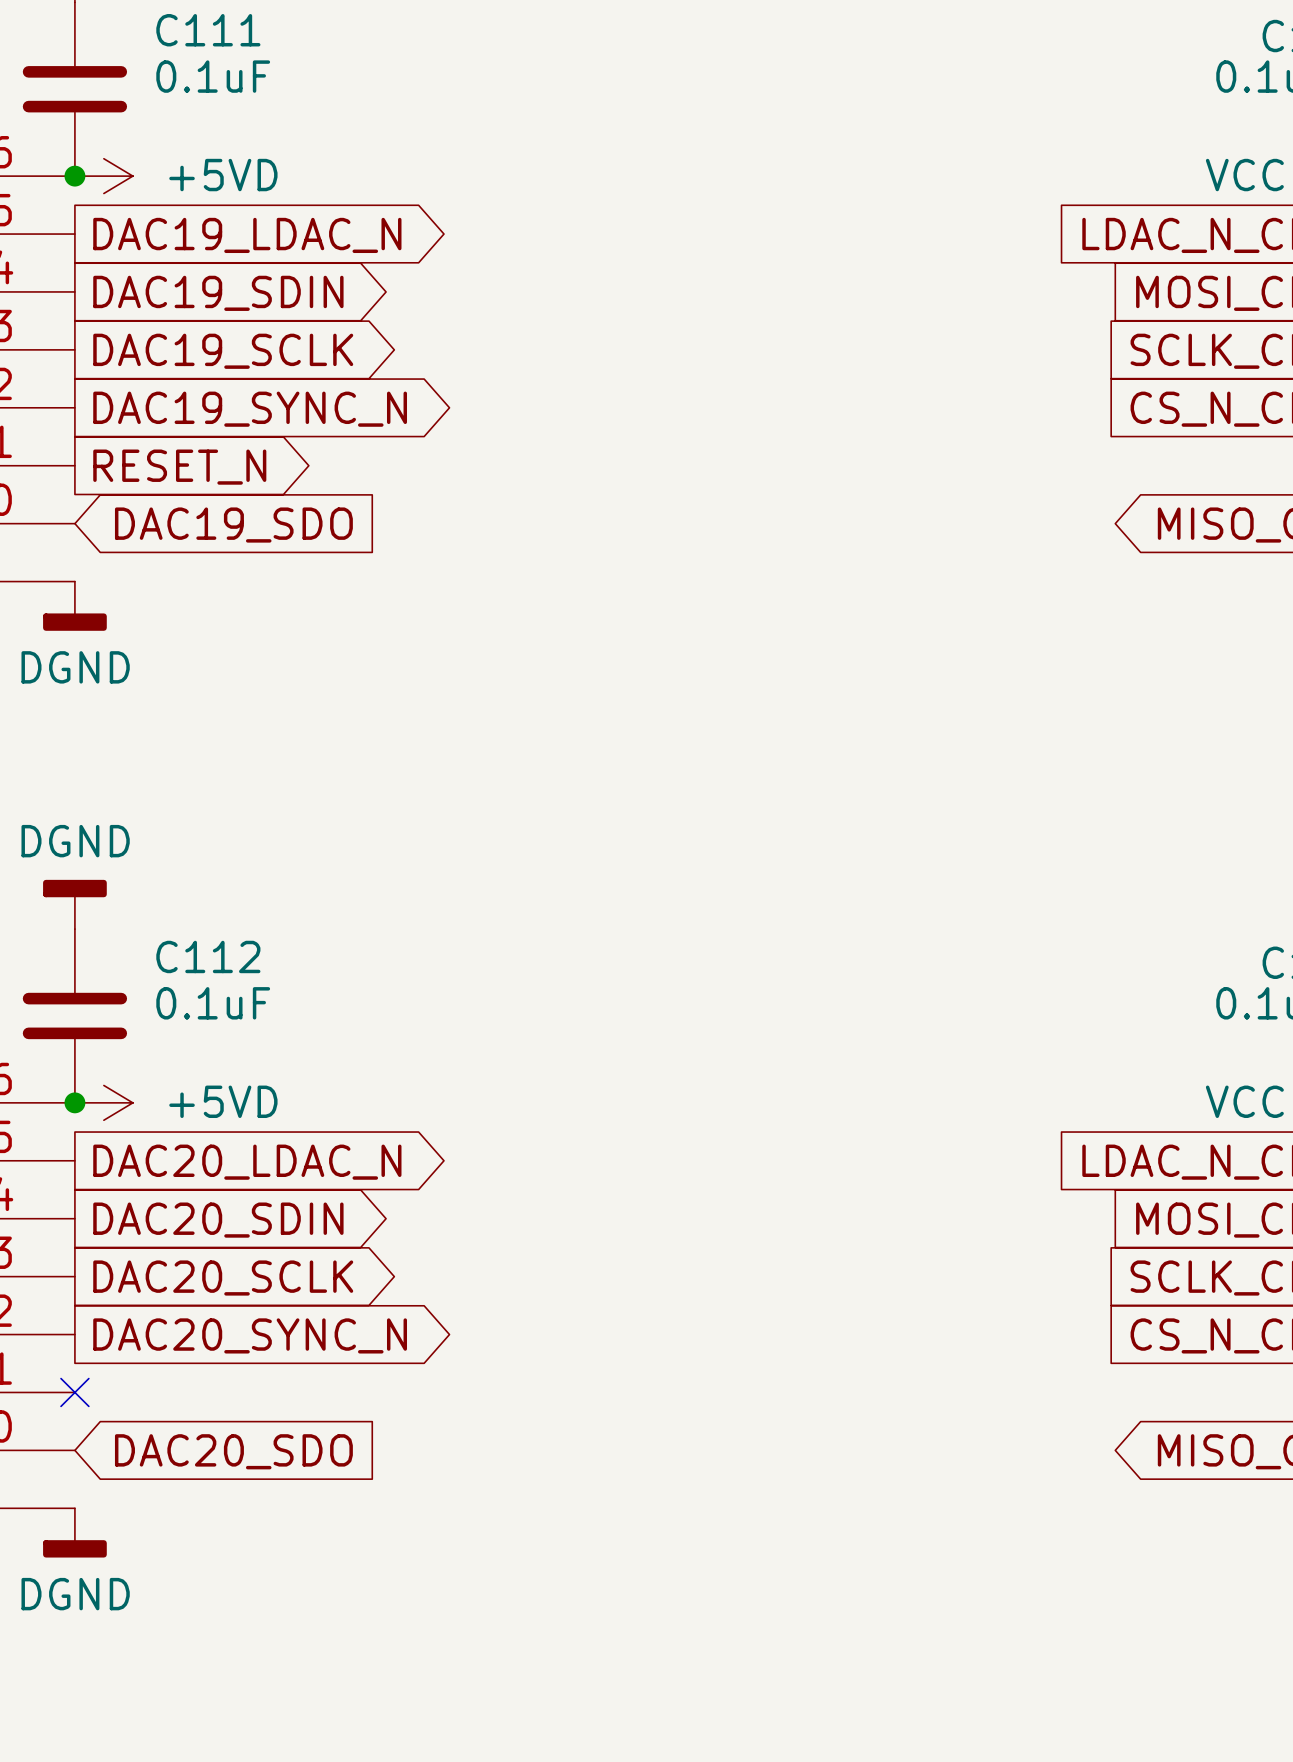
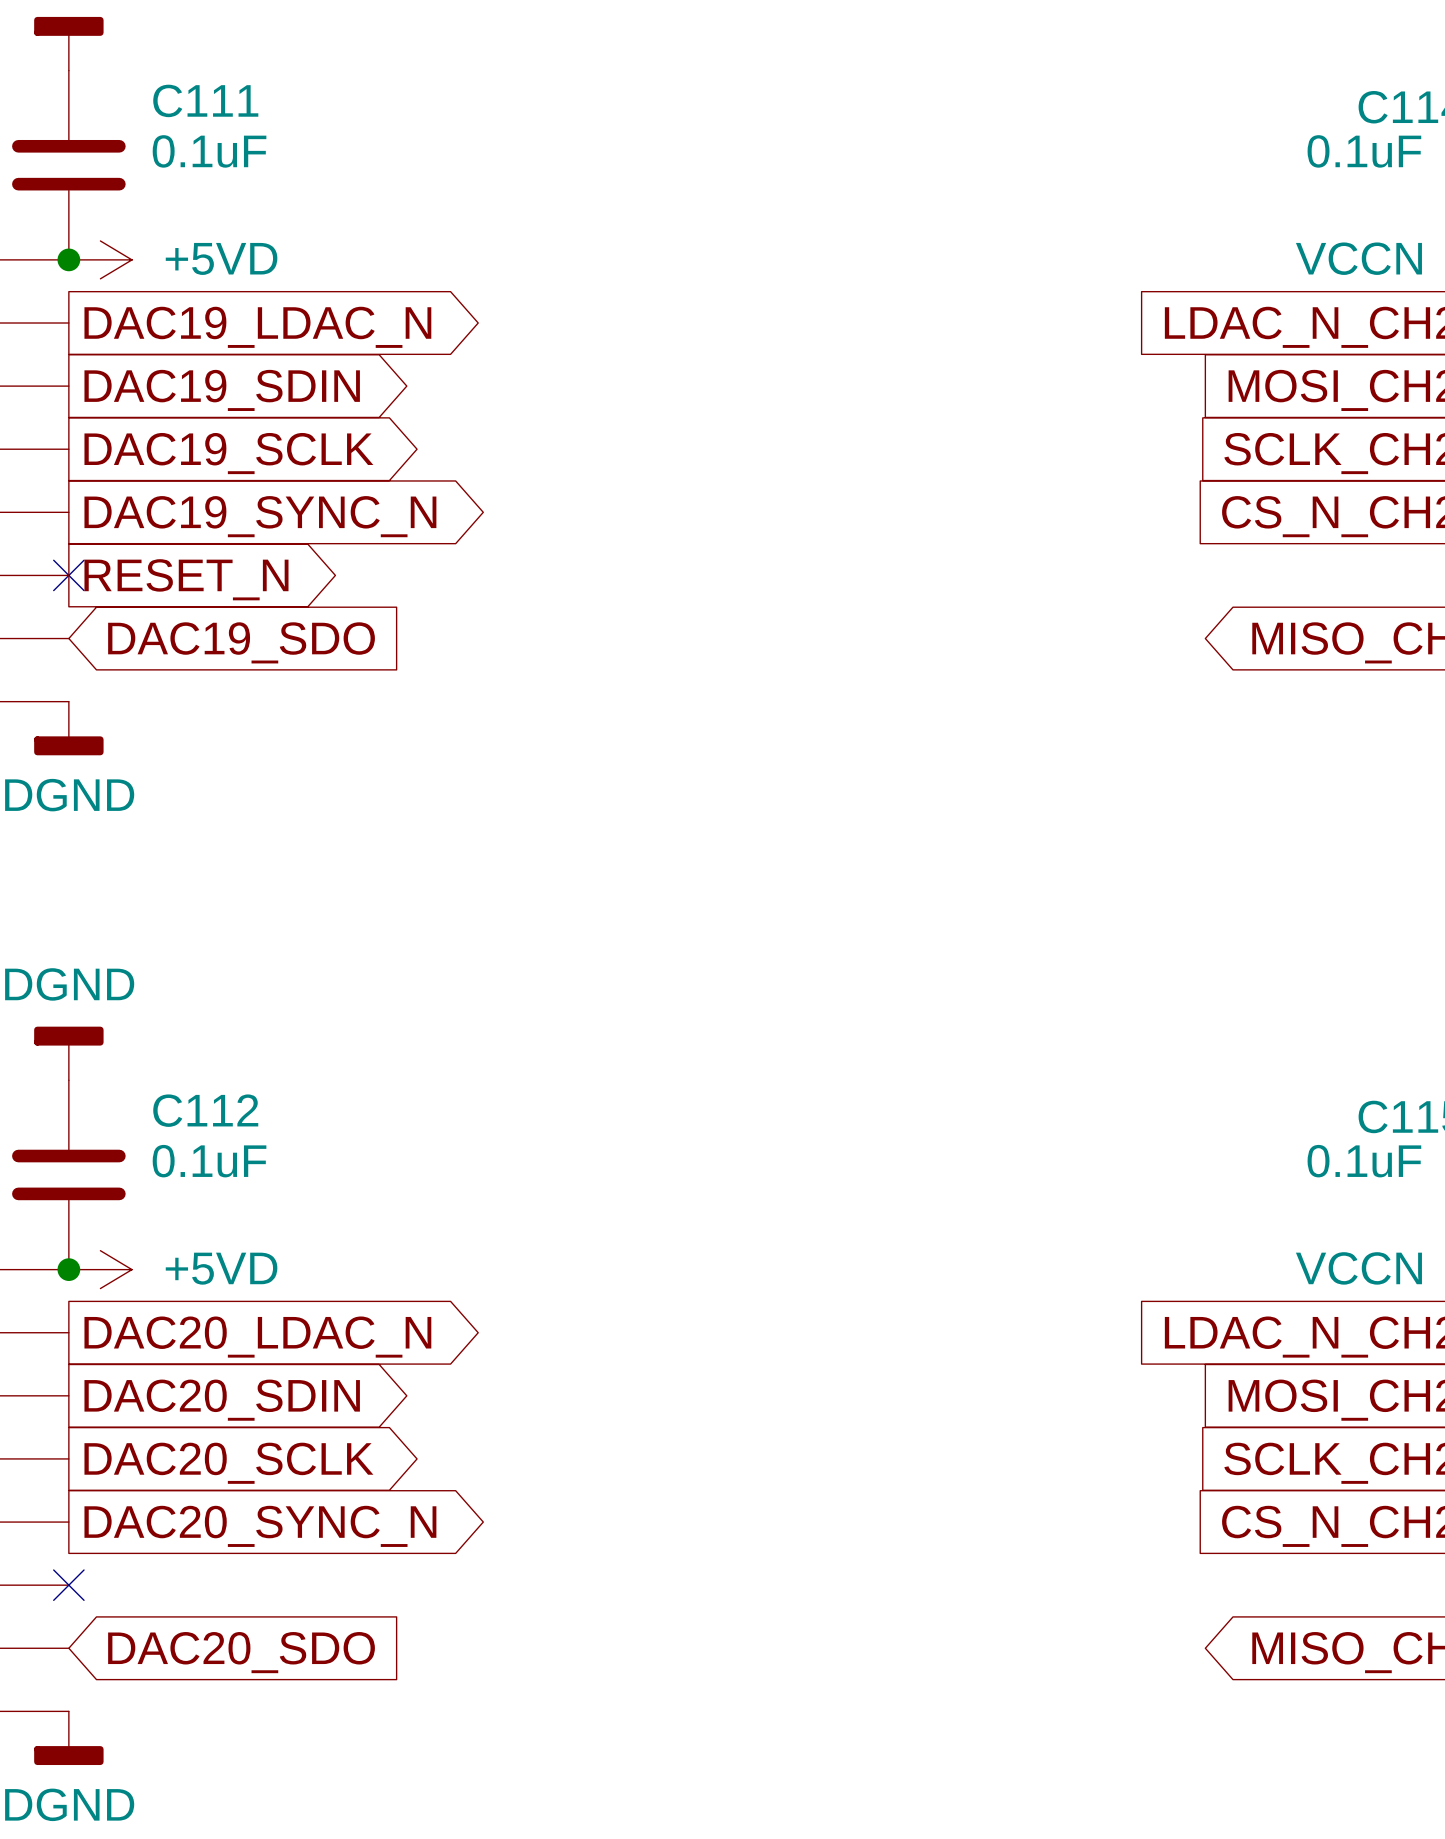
no-connect mark: none -> (68, 575)

